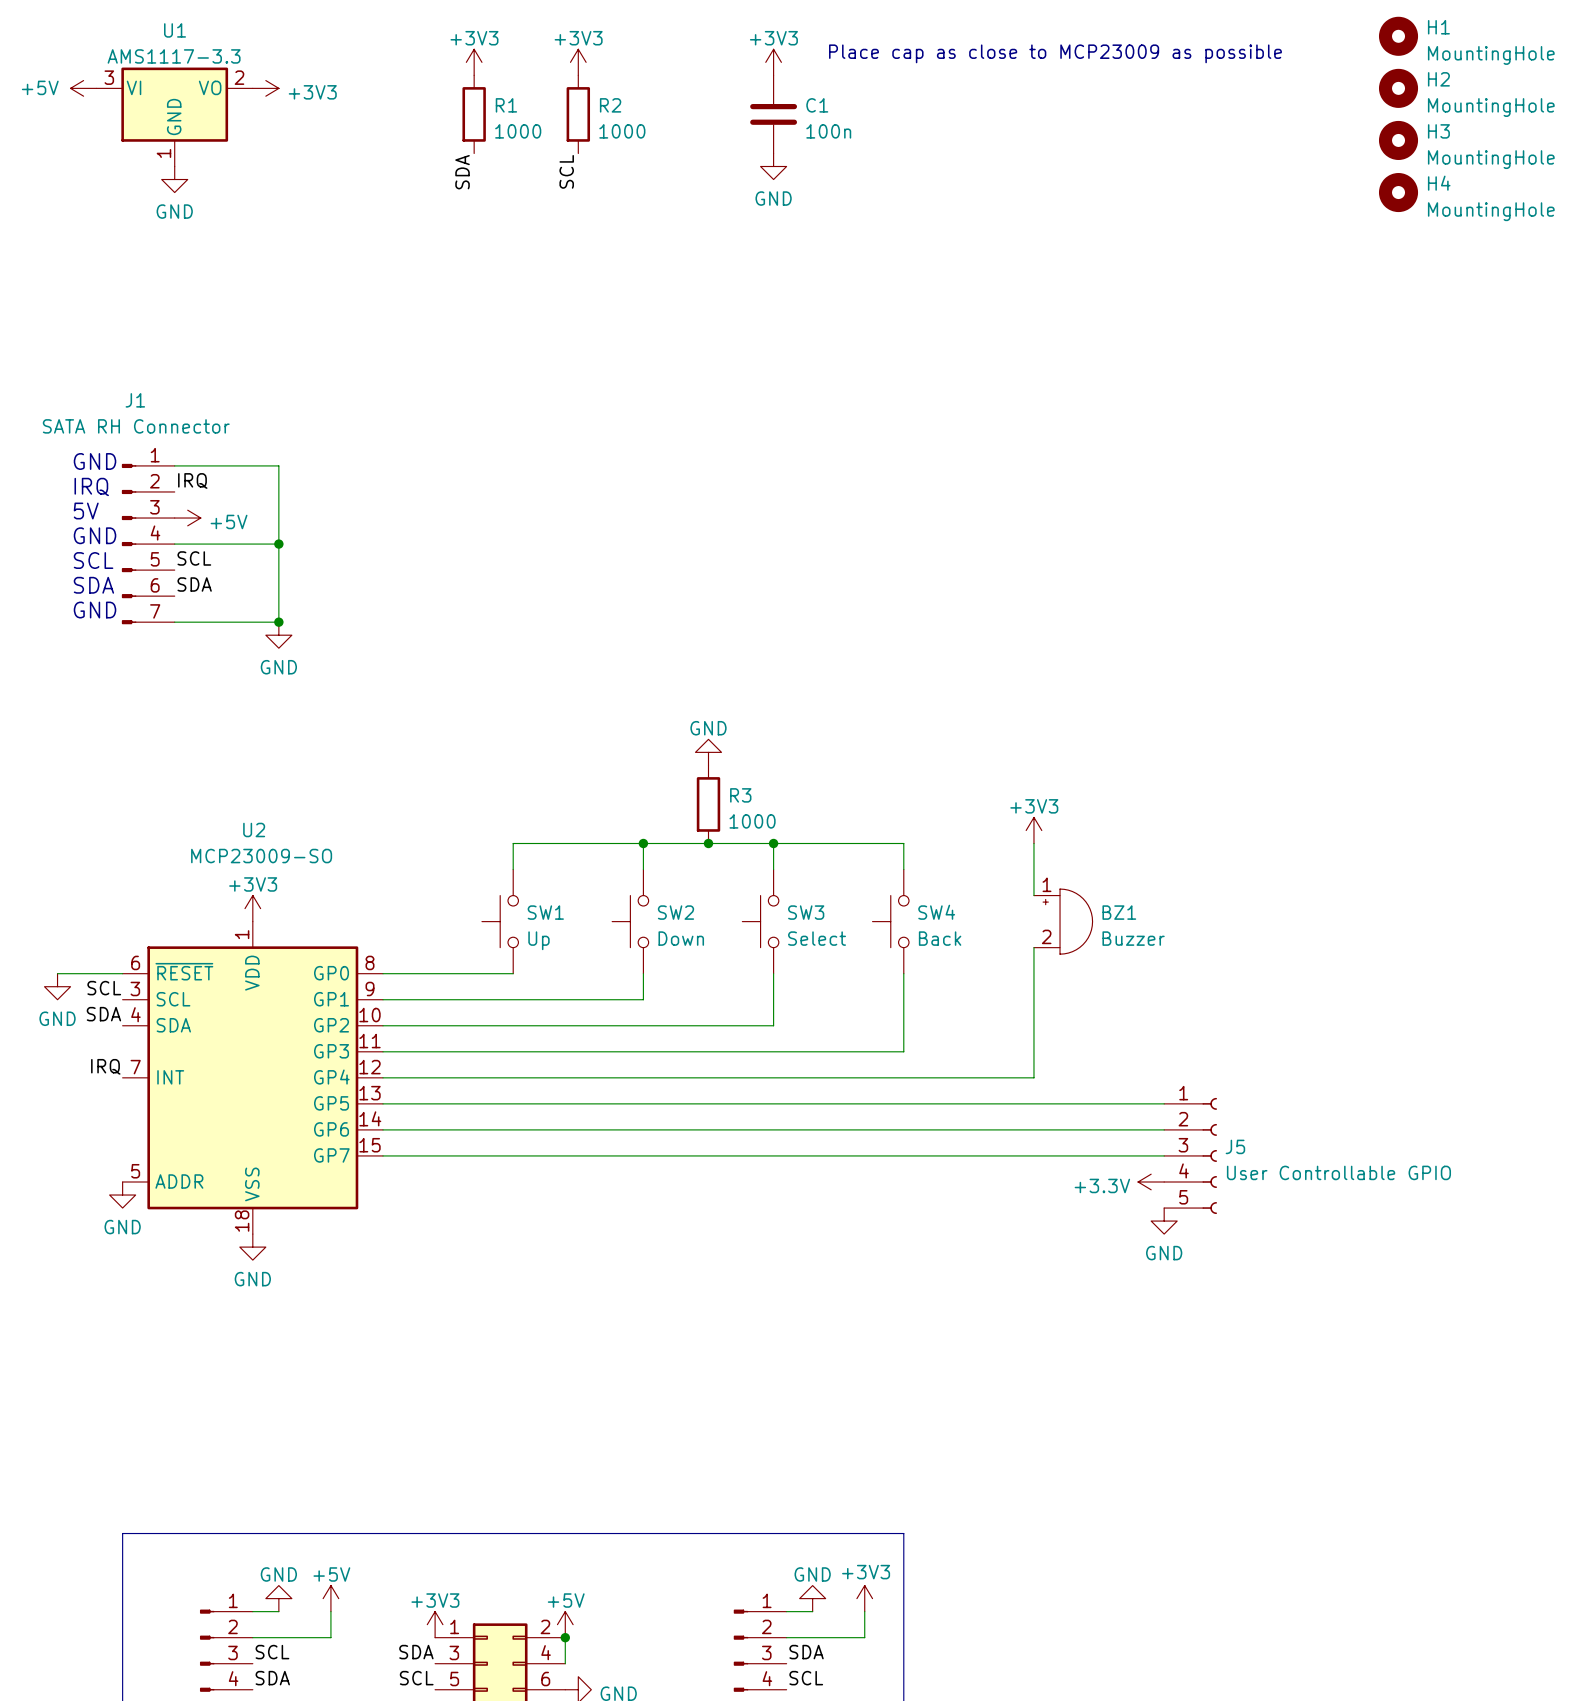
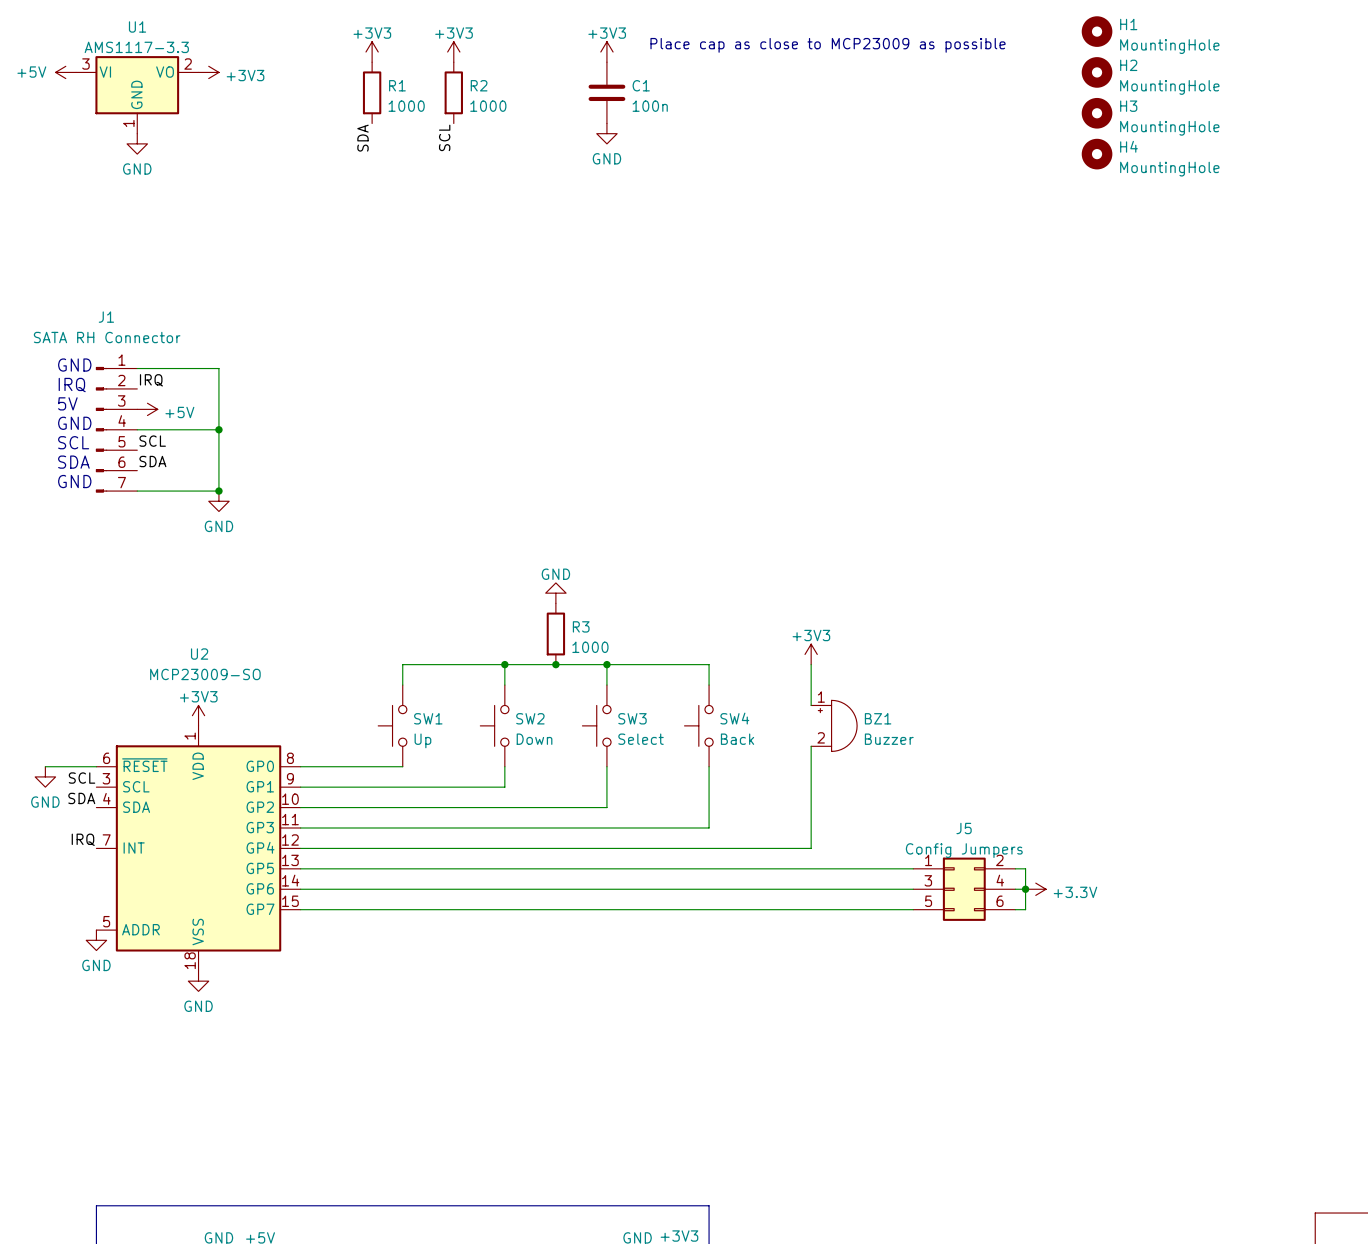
J5 symbol: [1164, 1097, 1218, 1215] -> [913, 857, 1016, 921]
wire: none -> (1015, 868) (1025, 868) (1025, 909) (1015, 909)
wire: none -> (1015, 889) (1025, 889)
junction: none -> (1025, 889)
J5 name position: J5 (1235, 1146) -> J5 (964, 828)
J5 value: User Controllable GPIO (1338, 1172) -> Config Jumpers (964, 850)
power symbol rotation: 0° (1151, 1182) -> 180° (1035, 889)
power symbol position: +3.3V (1151, 1182) -> +3.3V (1035, 889)
power symbol: GND (1164, 1221) -> none

